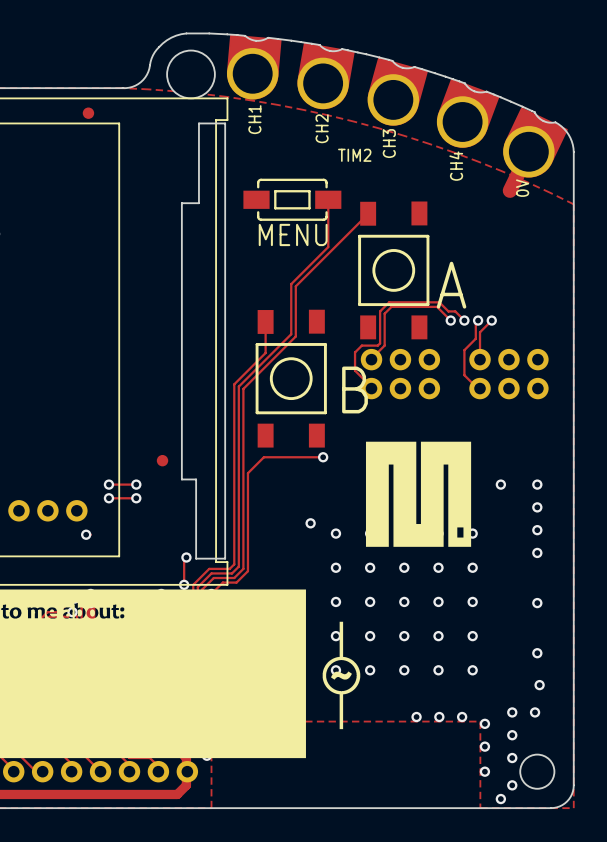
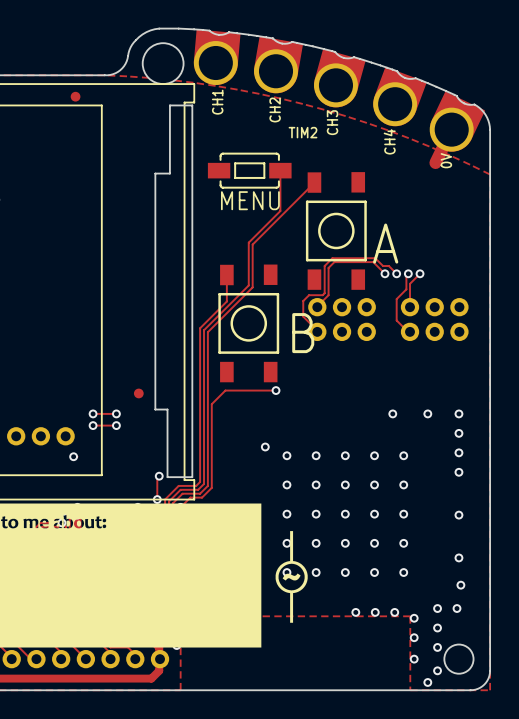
drawing: [365, 441, 472, 547] -> none

